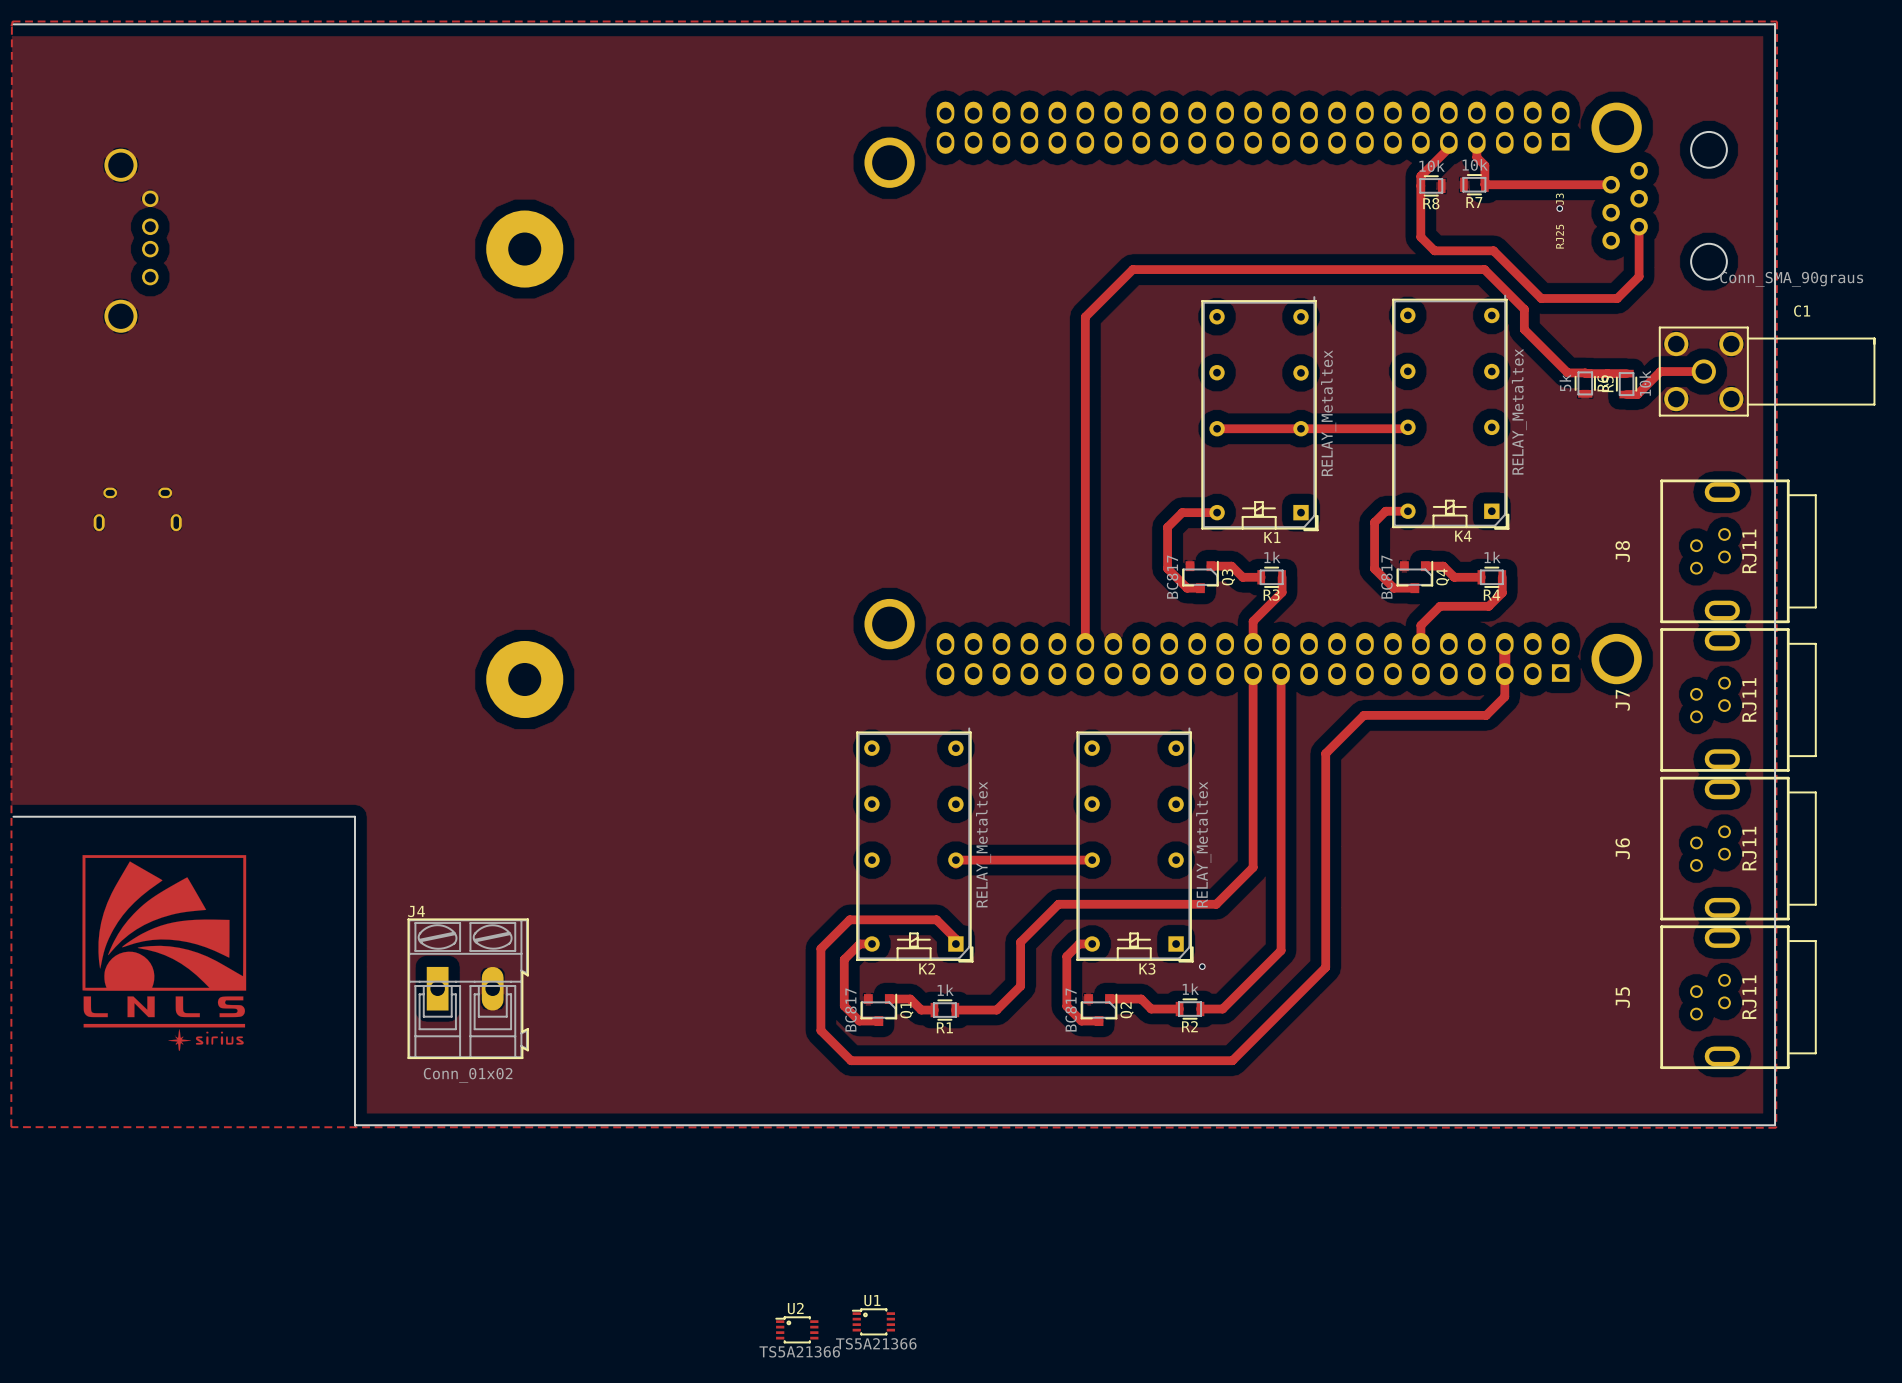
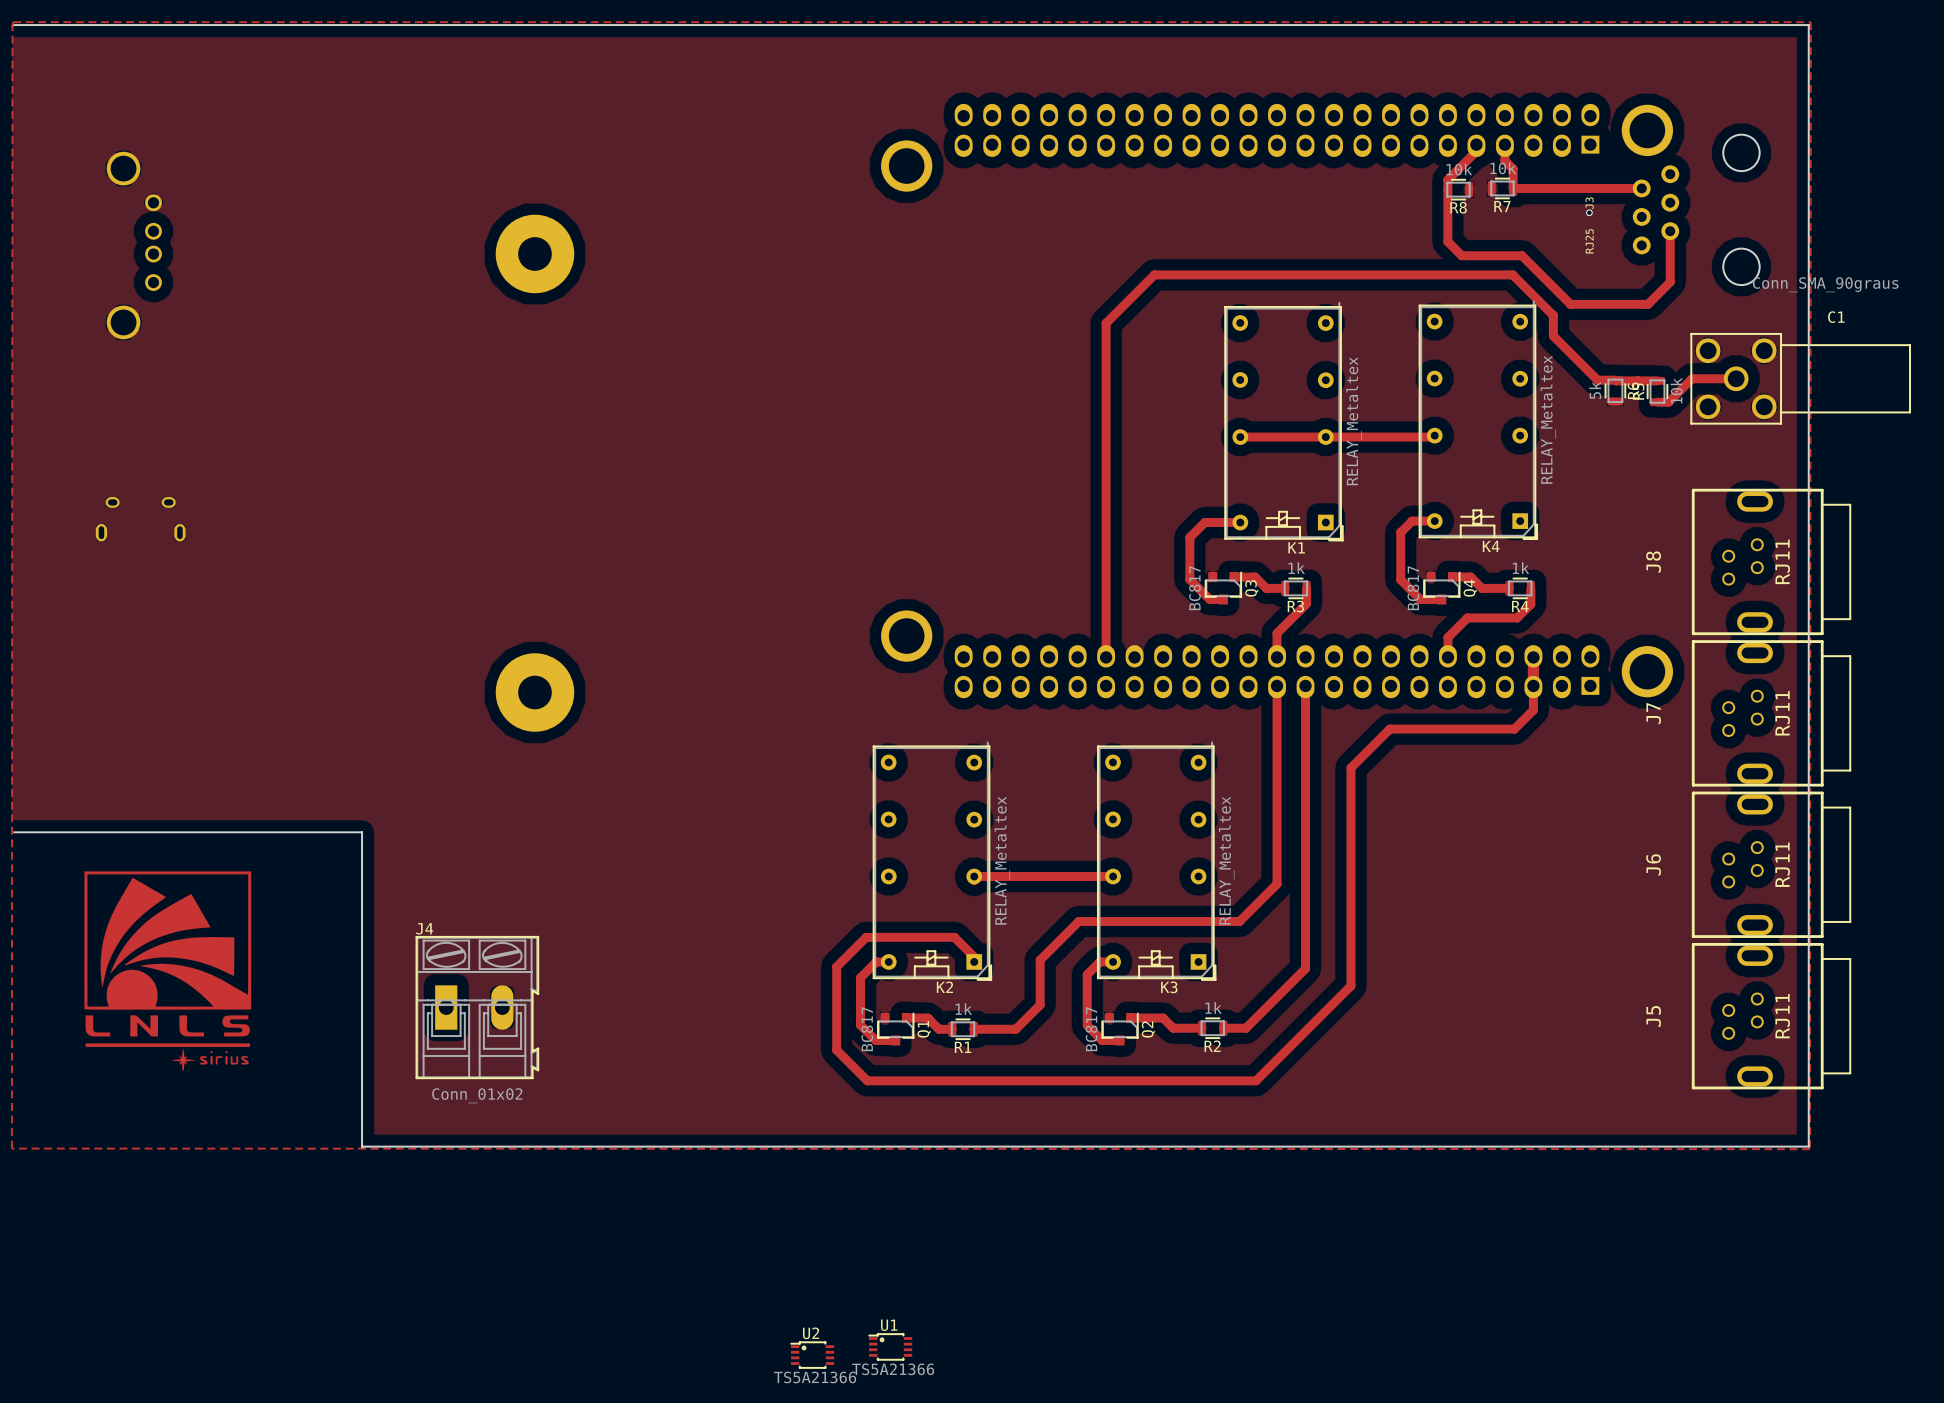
via: (1202, 966) -> none

